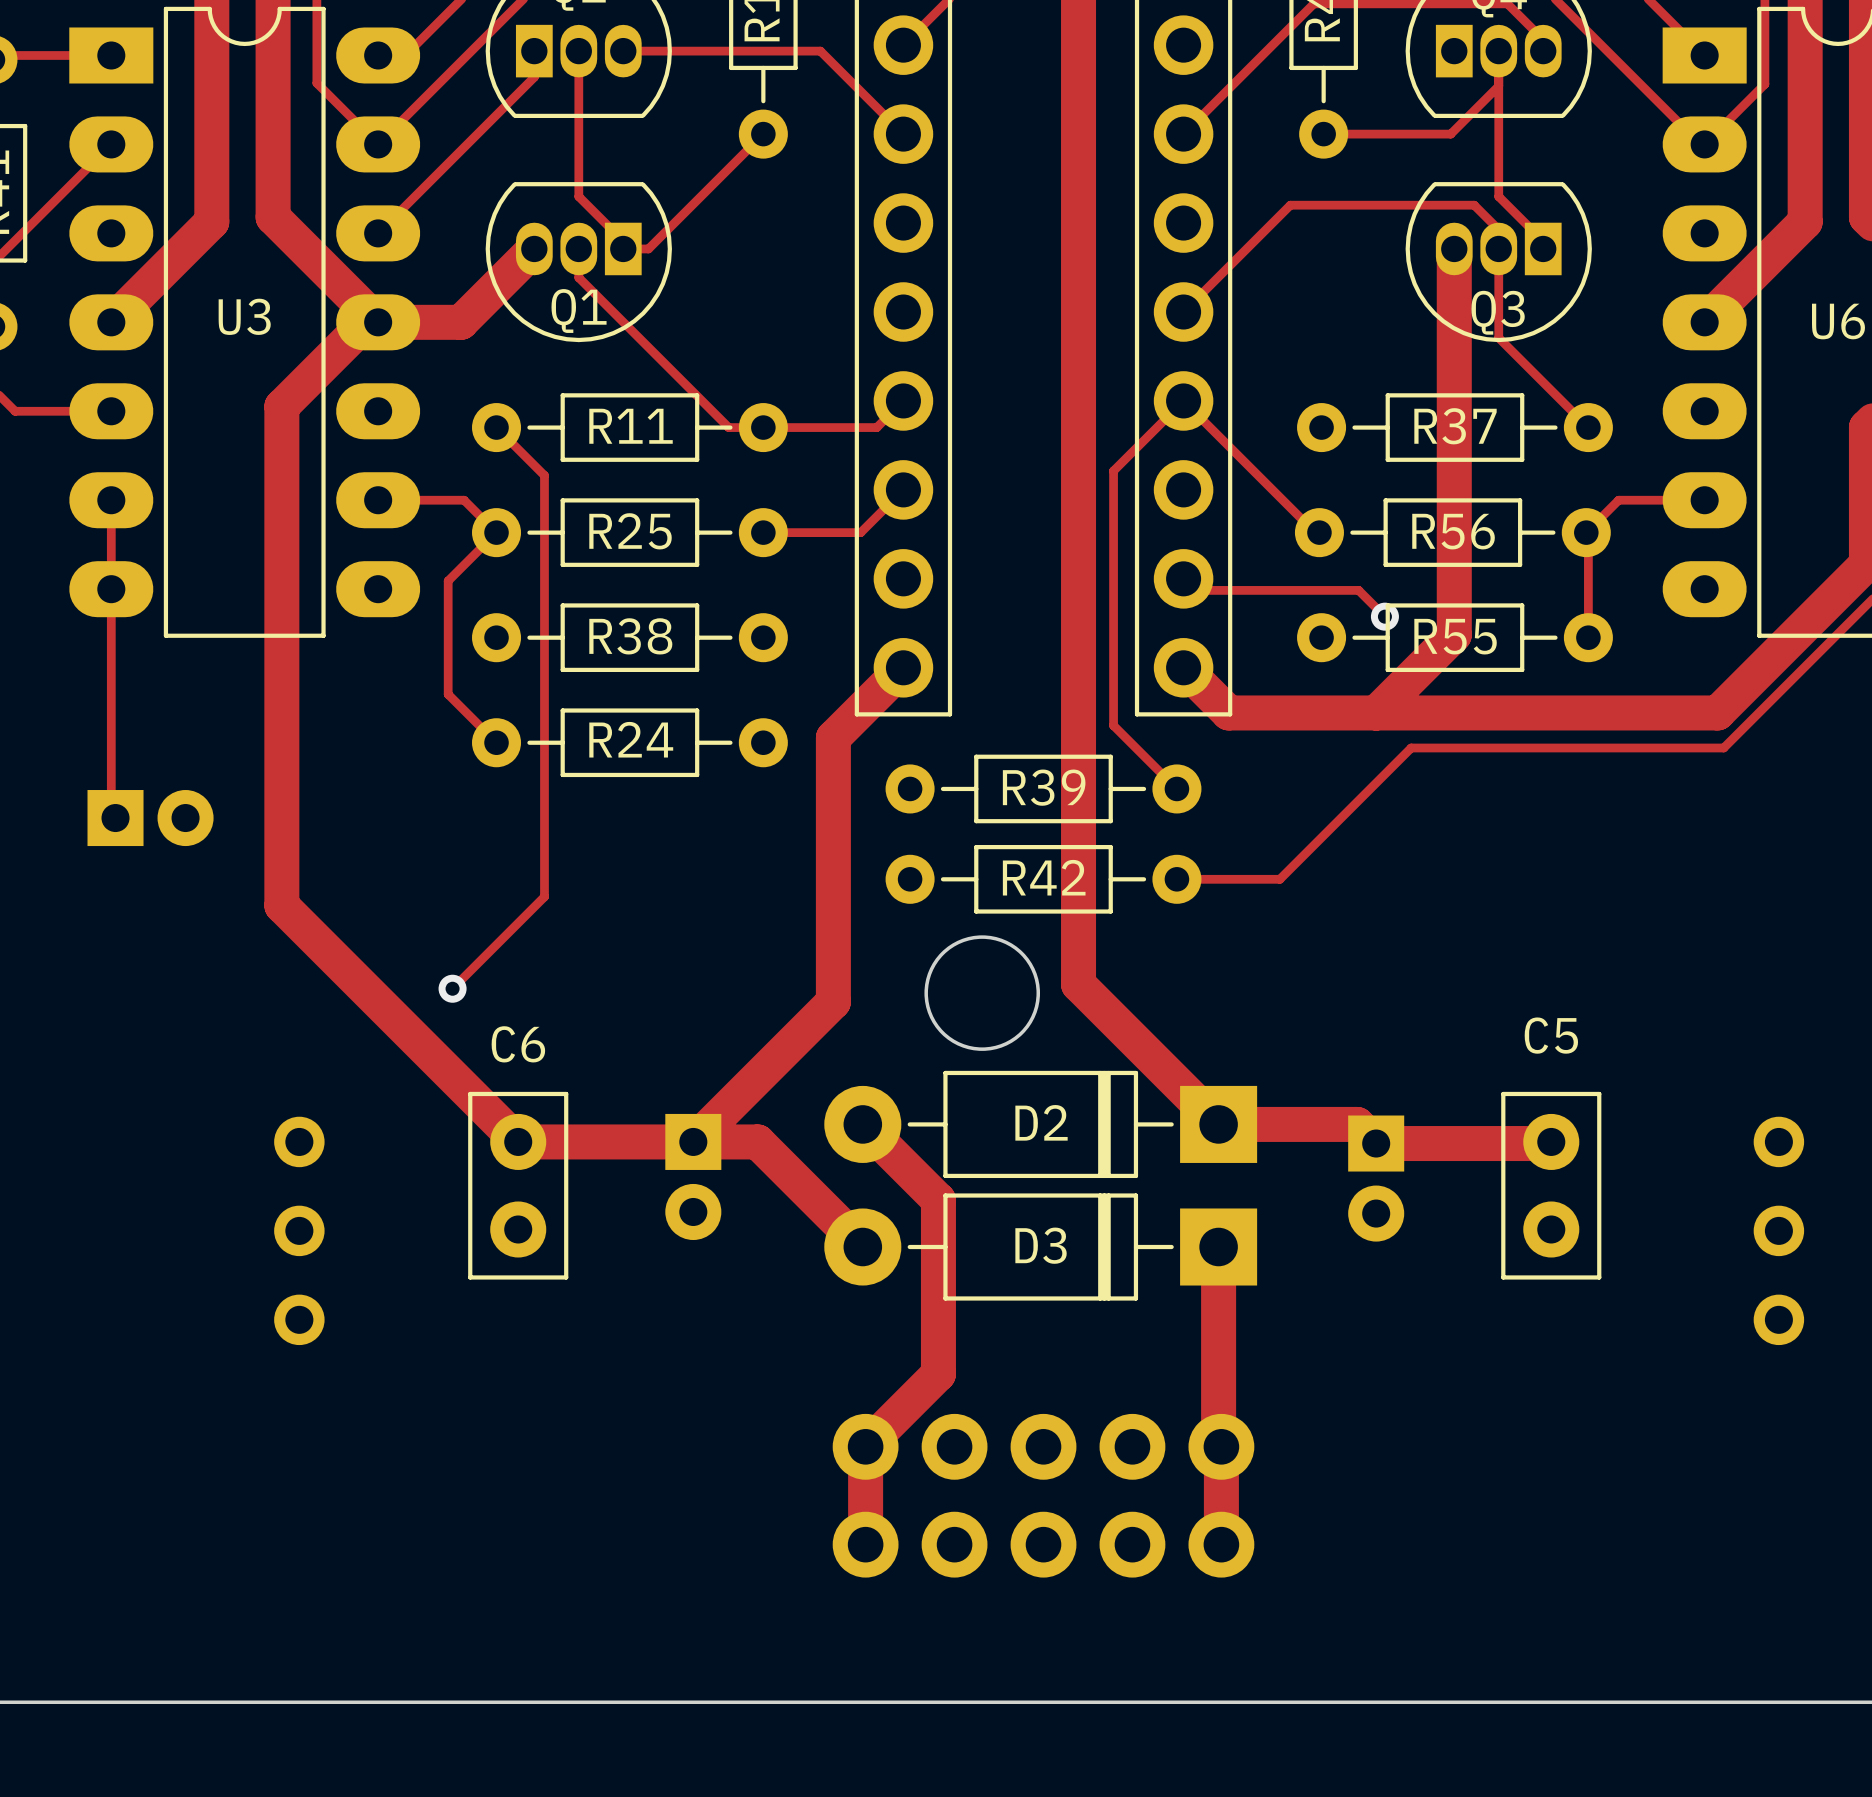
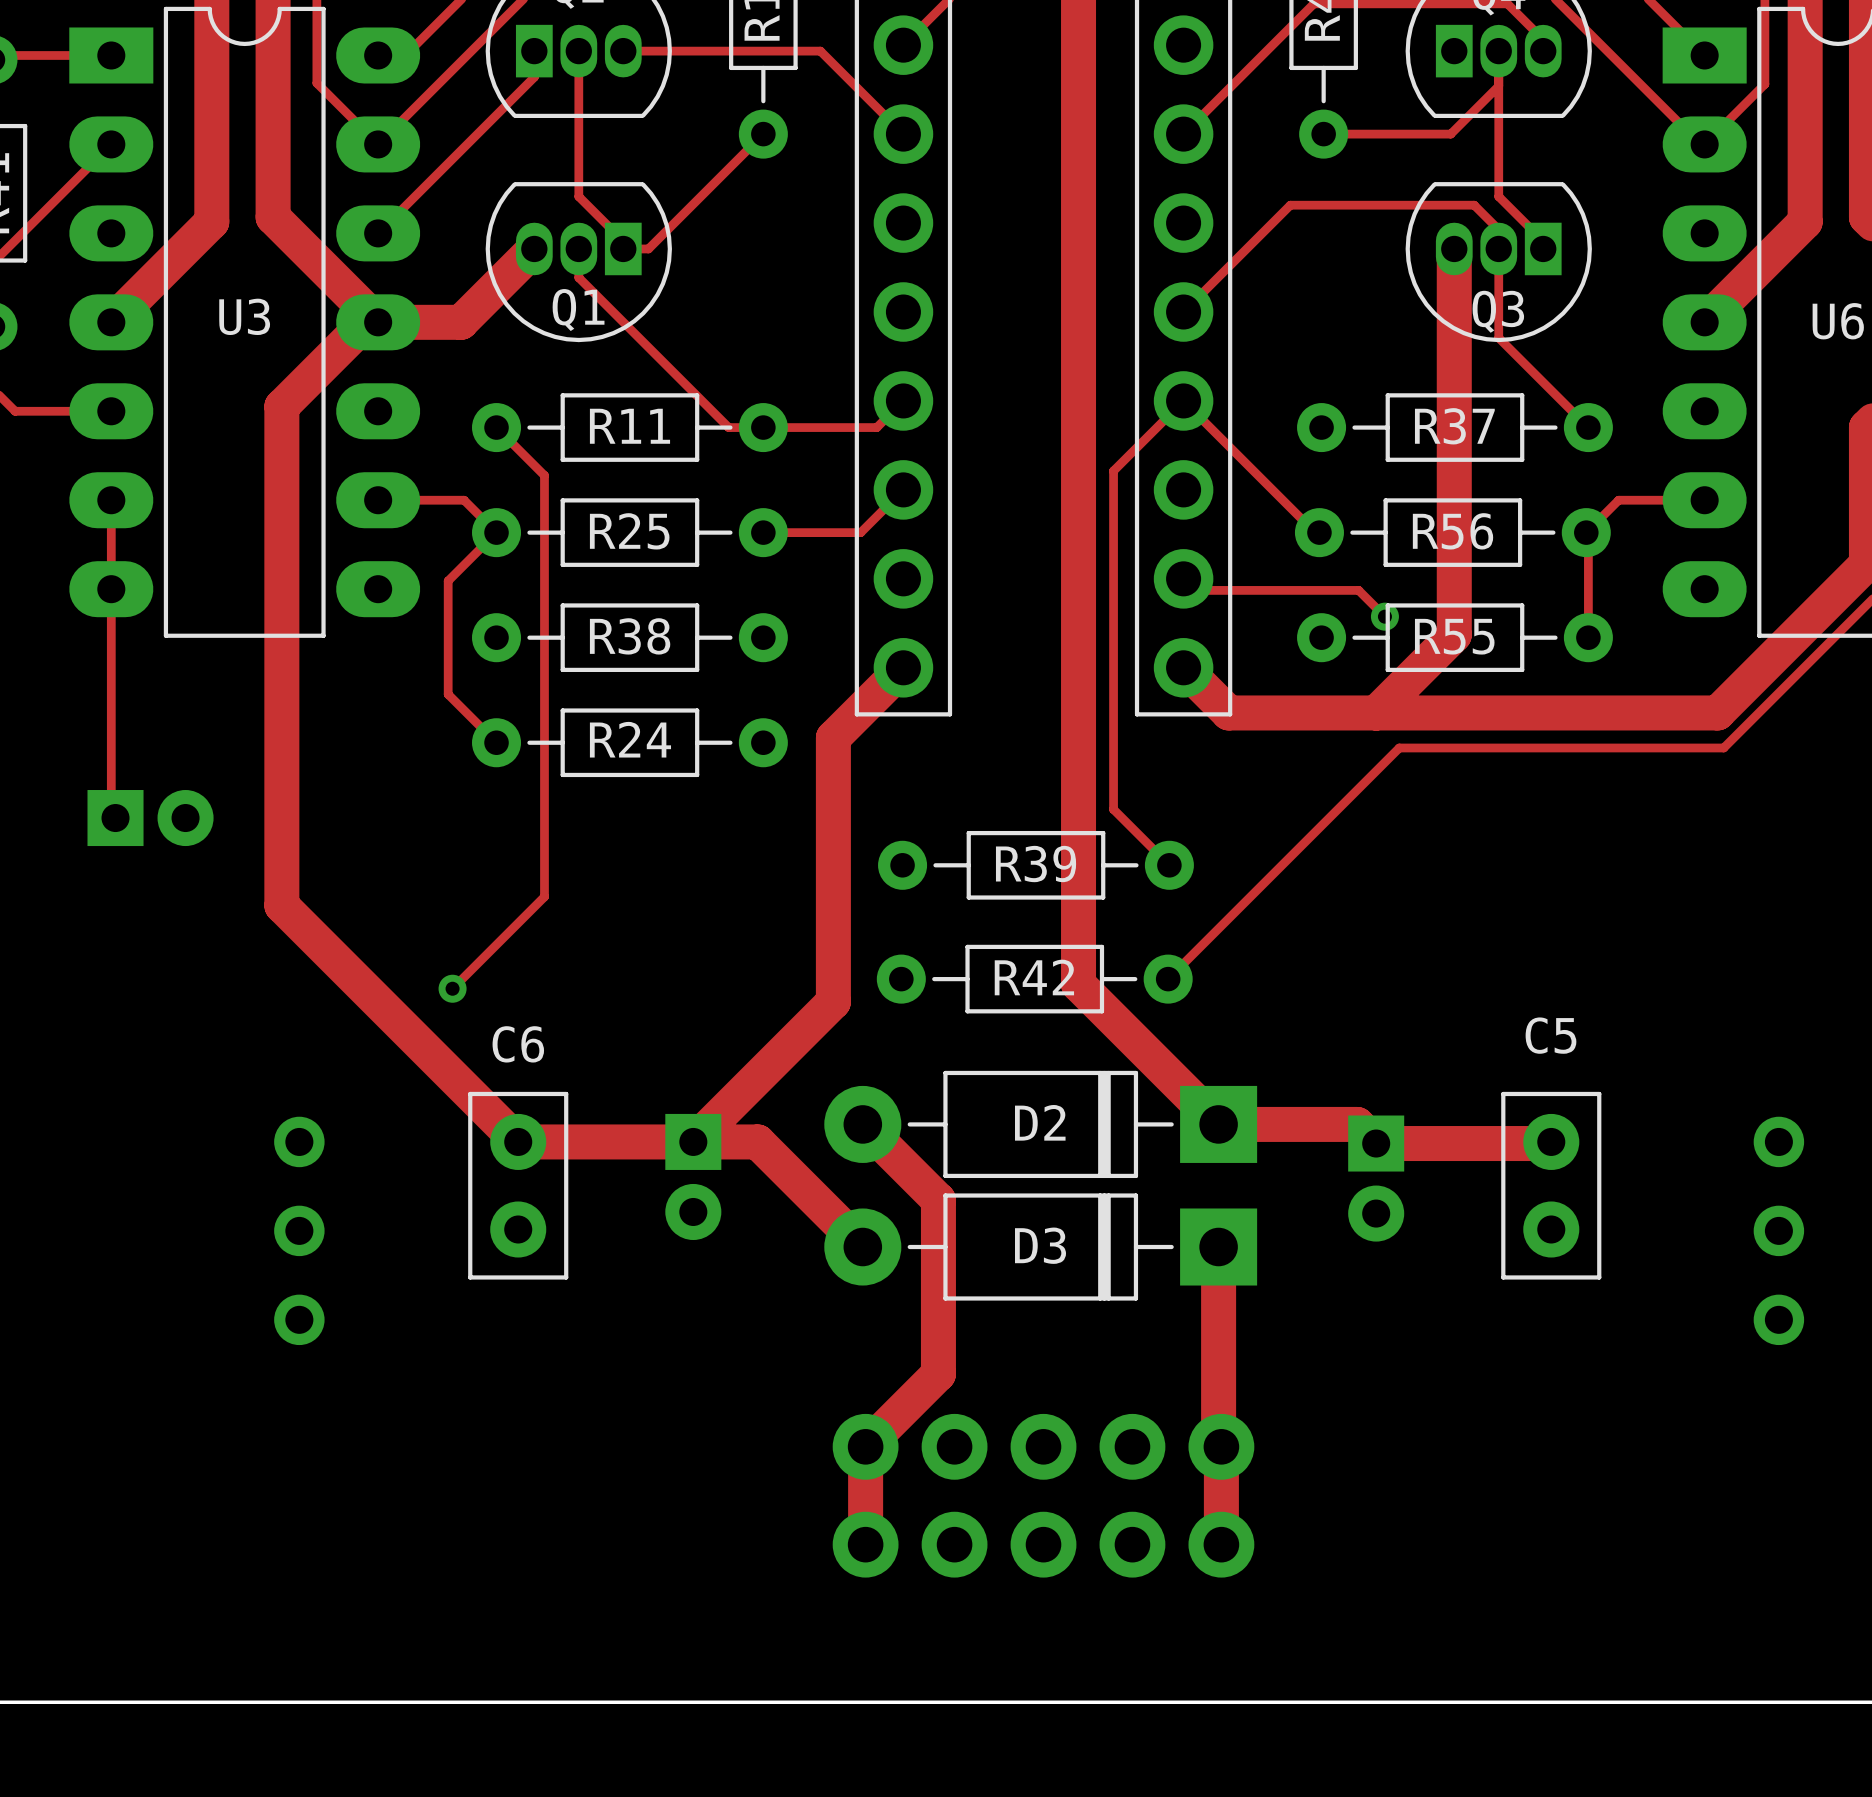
track: (1113, 725) (1176, 788) -> (1113, 725) (1113, 809) (1169, 865)
track: (1411, 747) (1279, 879) (1176, 879) -> (1411, 747) (1399, 747) (1168, 979)
R39 position: (1043, 788) -> (1035, 865)
R42 position: (1043, 879) -> (1034, 979)
round board edge: [924, 935, 1041, 1051] -> none

